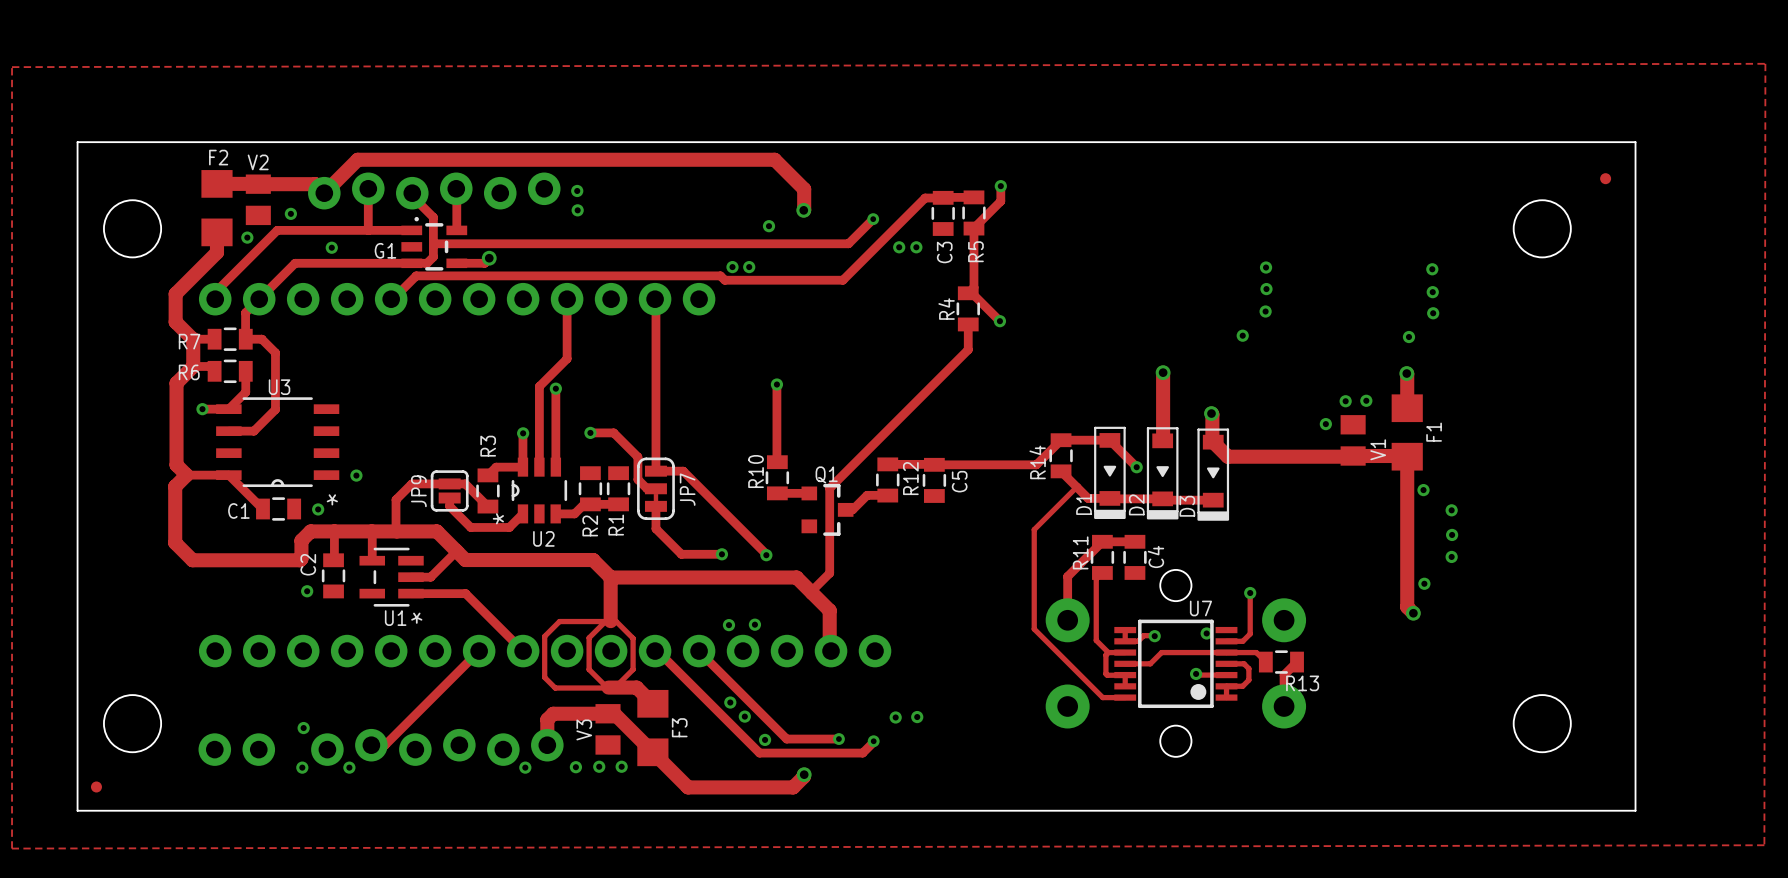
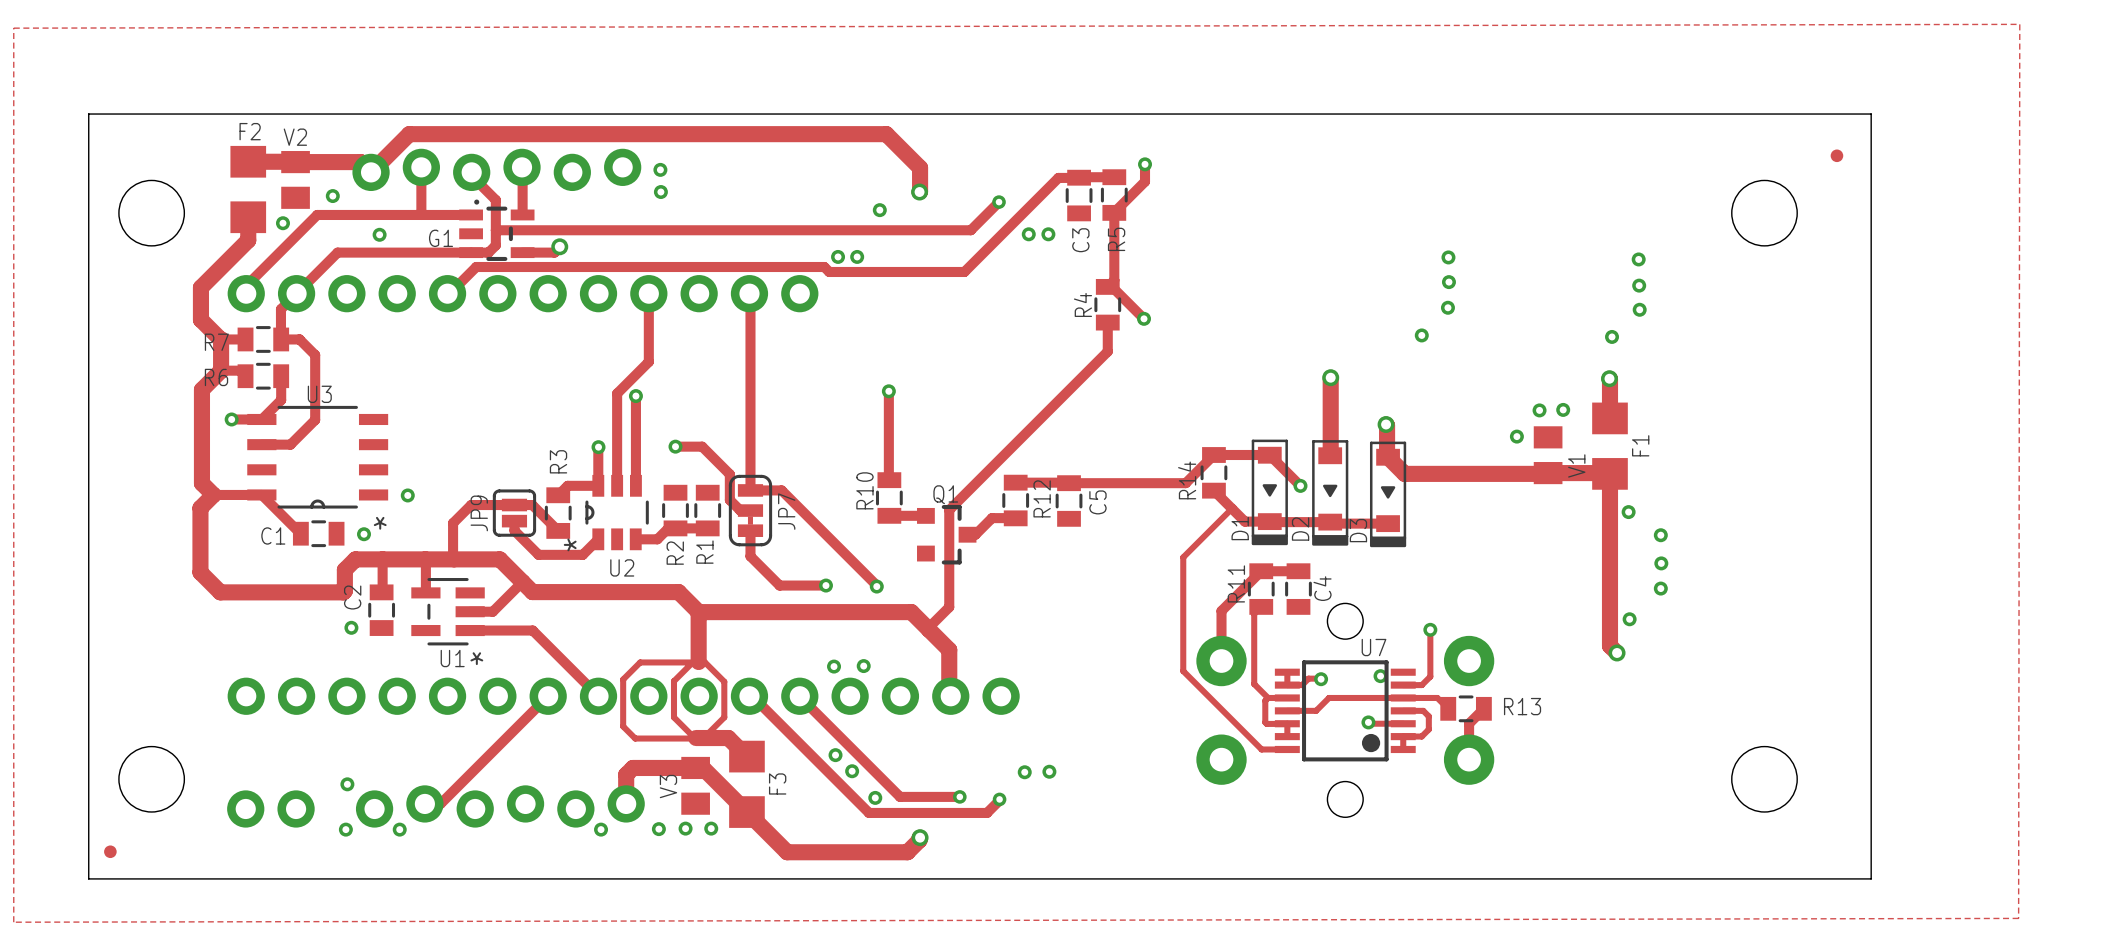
R13 name position: R13 (1302, 683) -> R13 (1522, 706)

